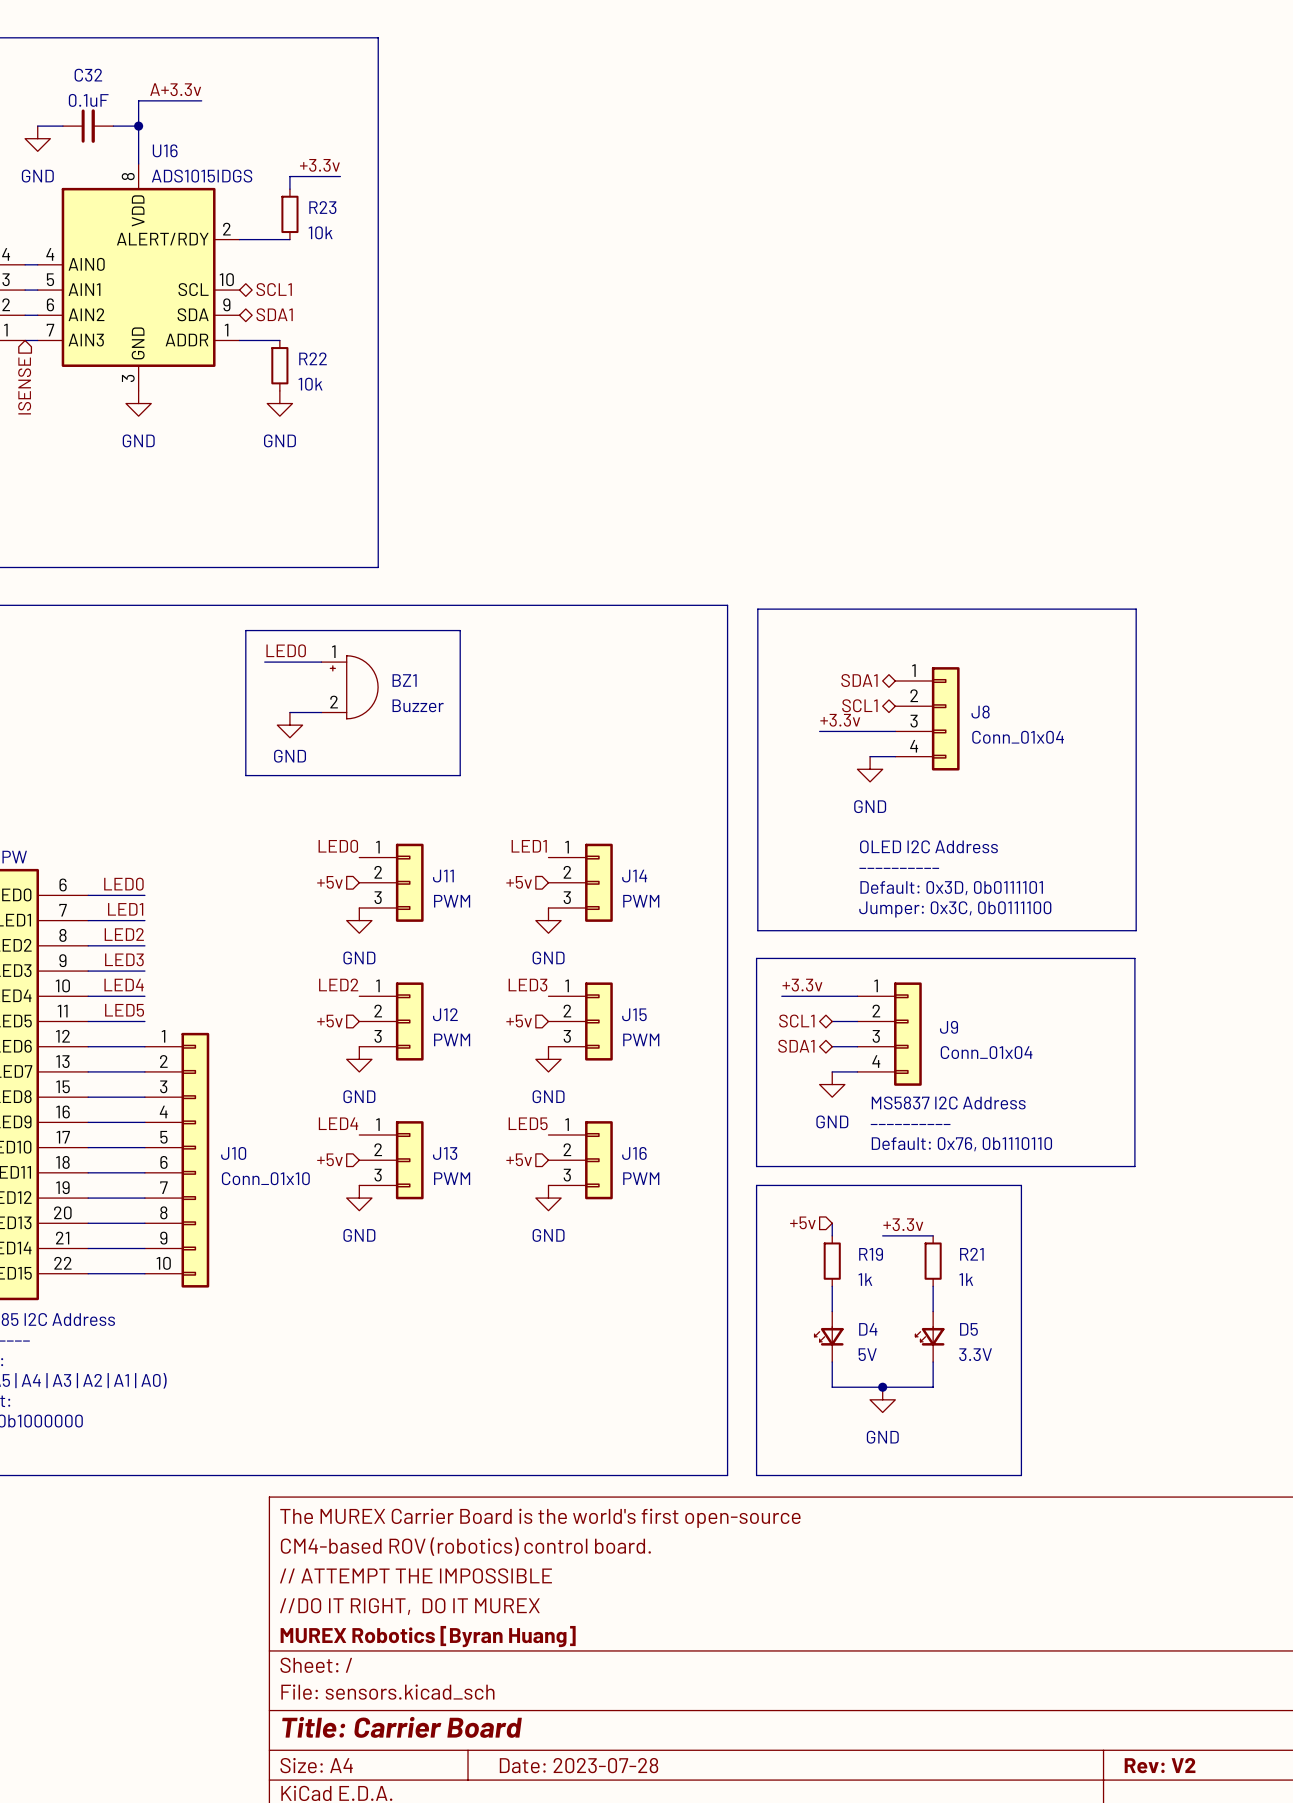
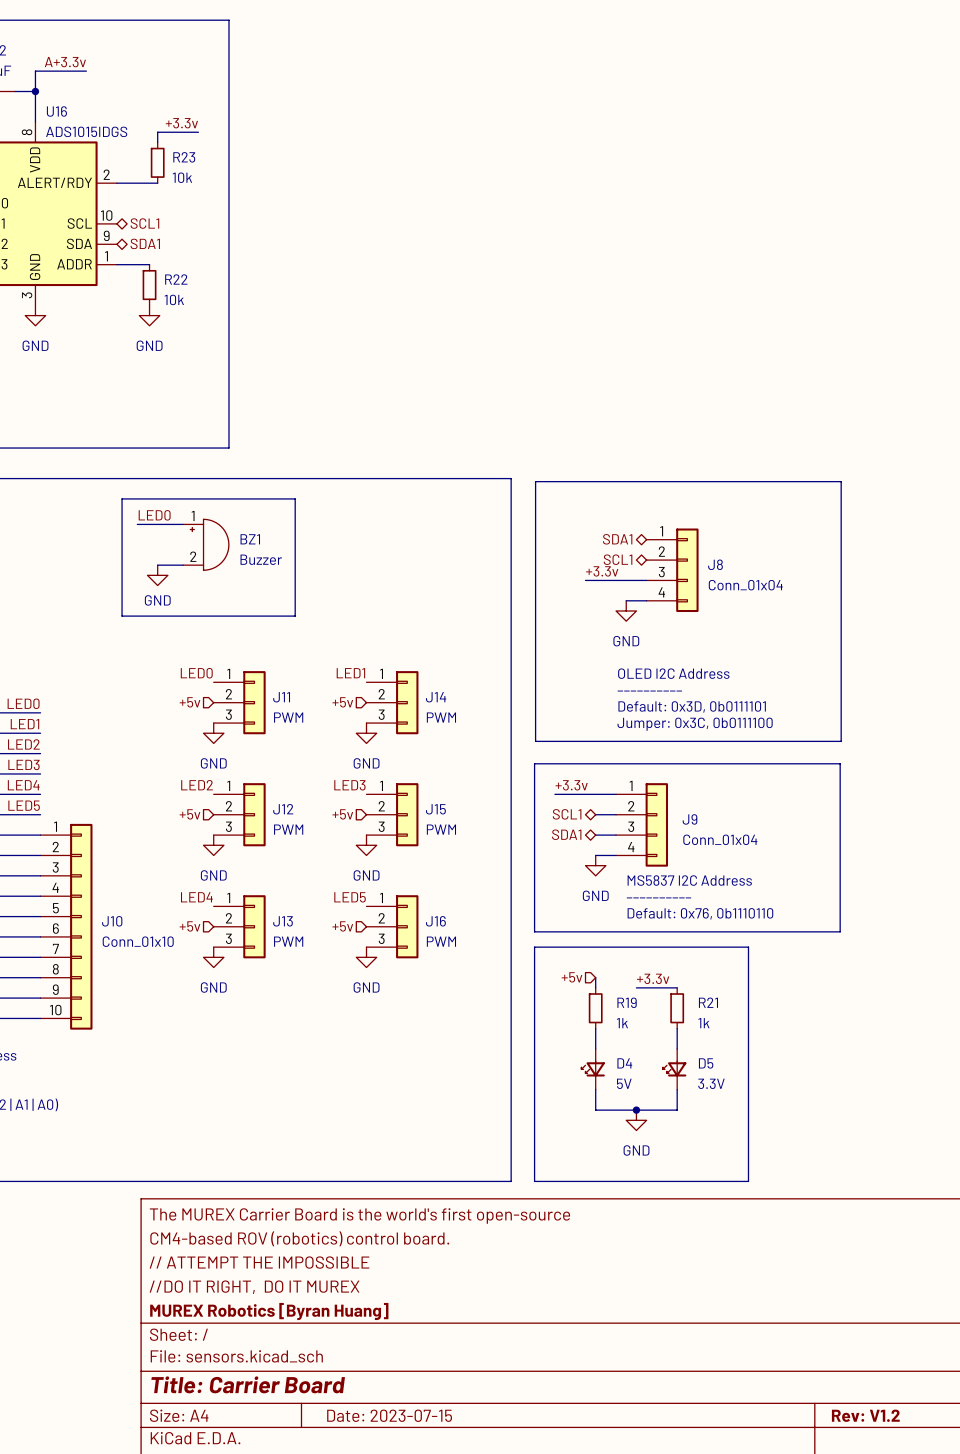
title block: Date: 2023-07-28 (579, 1765) -> Date: 2023-07-15 (389, 1415)
title block: Rev: V2 (1160, 1765) -> Rev: V1.2 (865, 1415)

